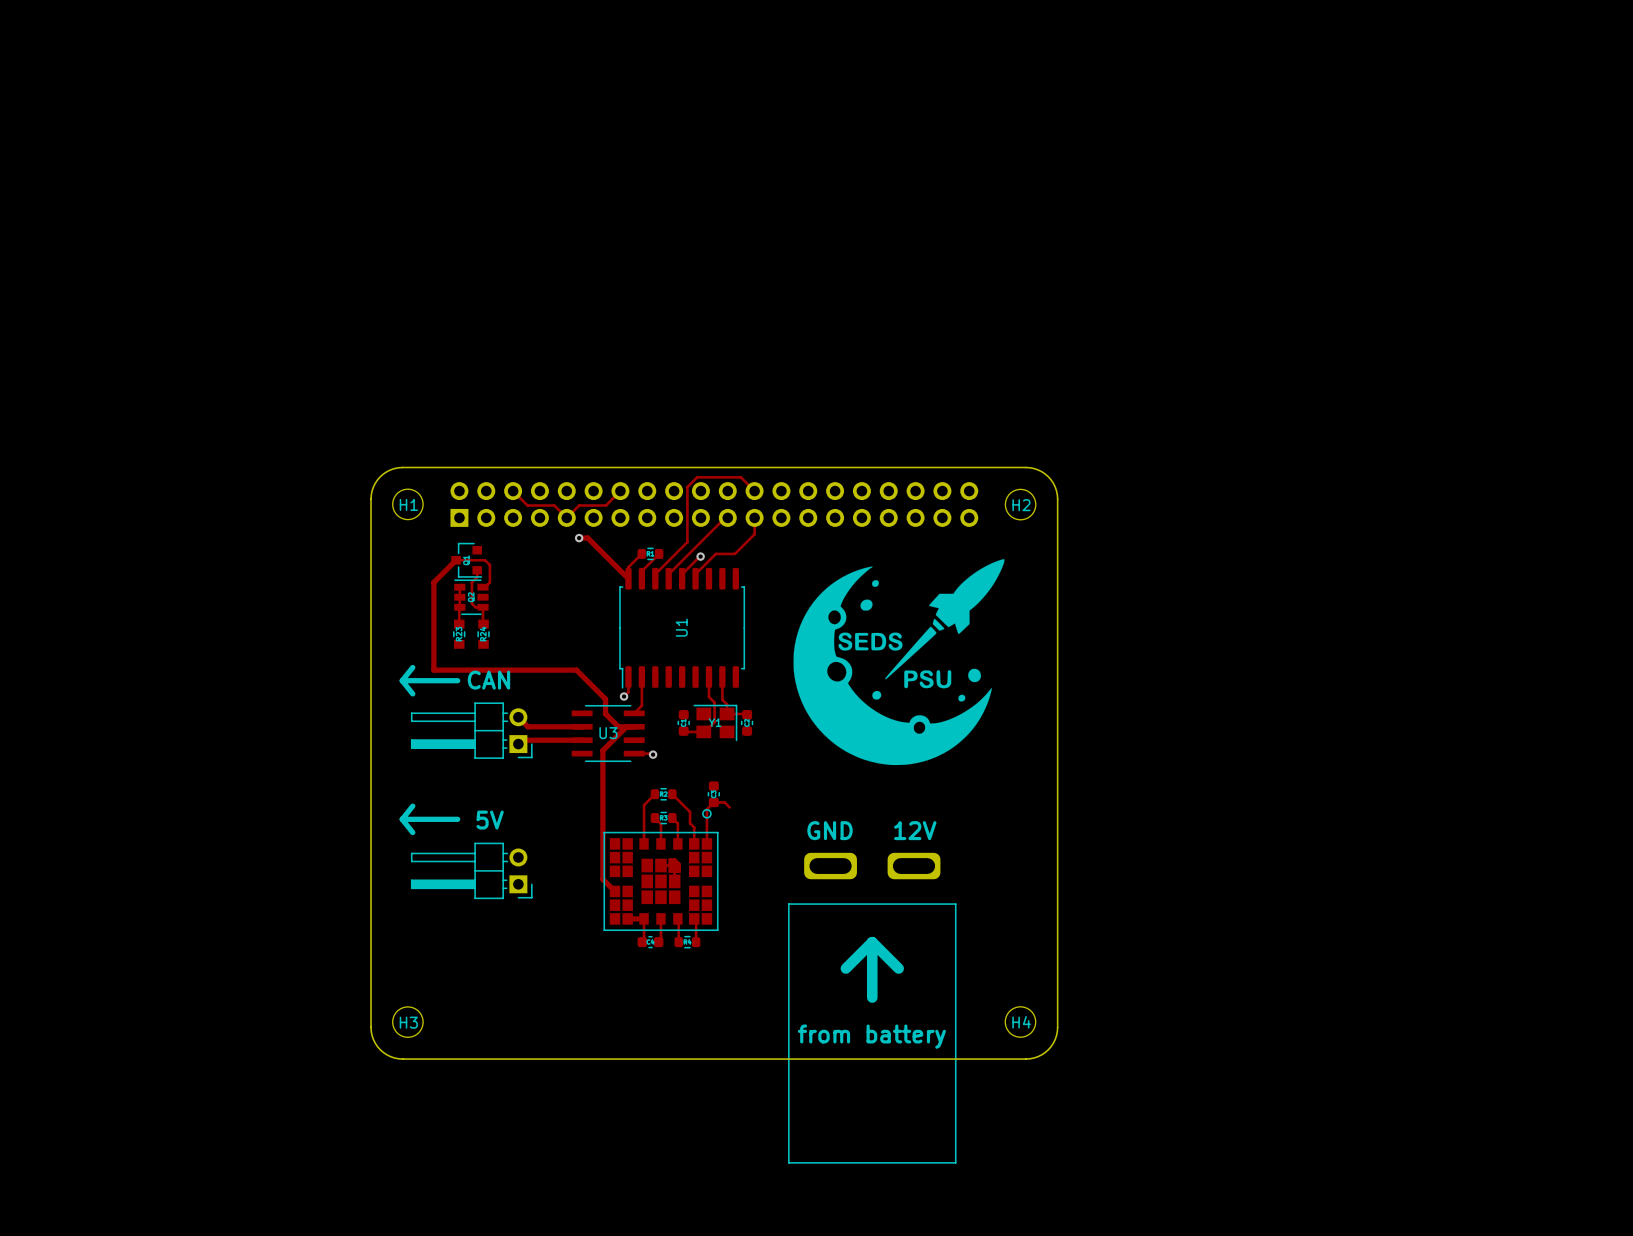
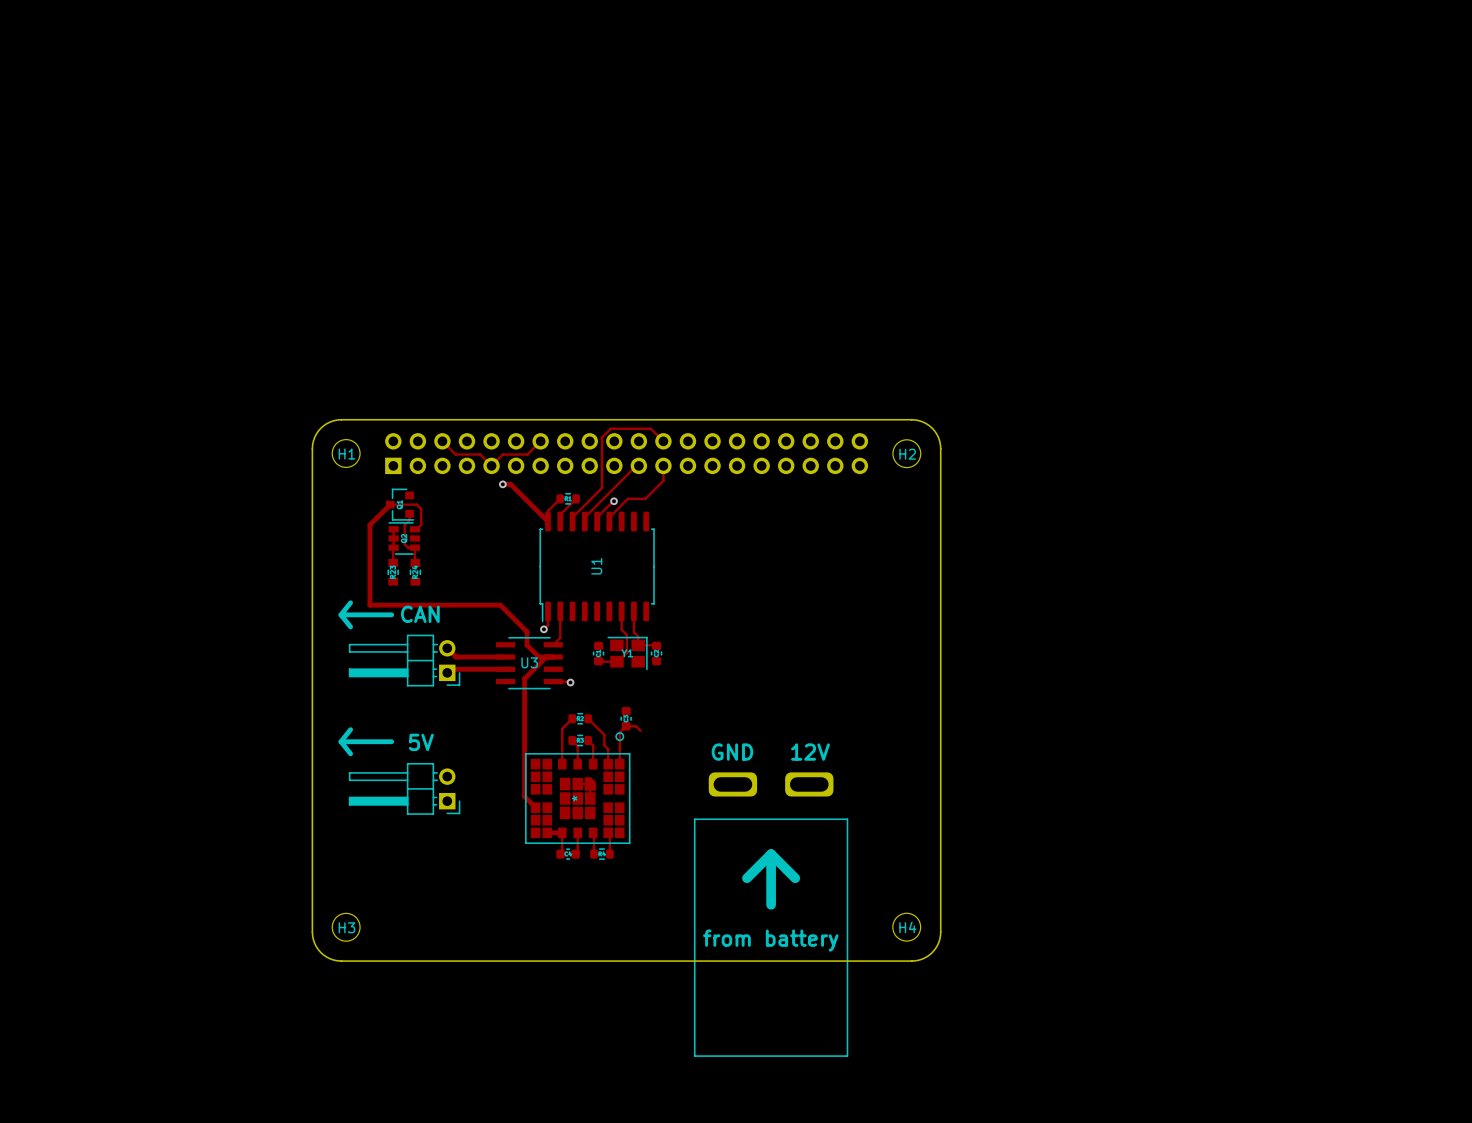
drawing: [793, 559, 1005, 766] -> none
part text: none -> * (574, 798)

